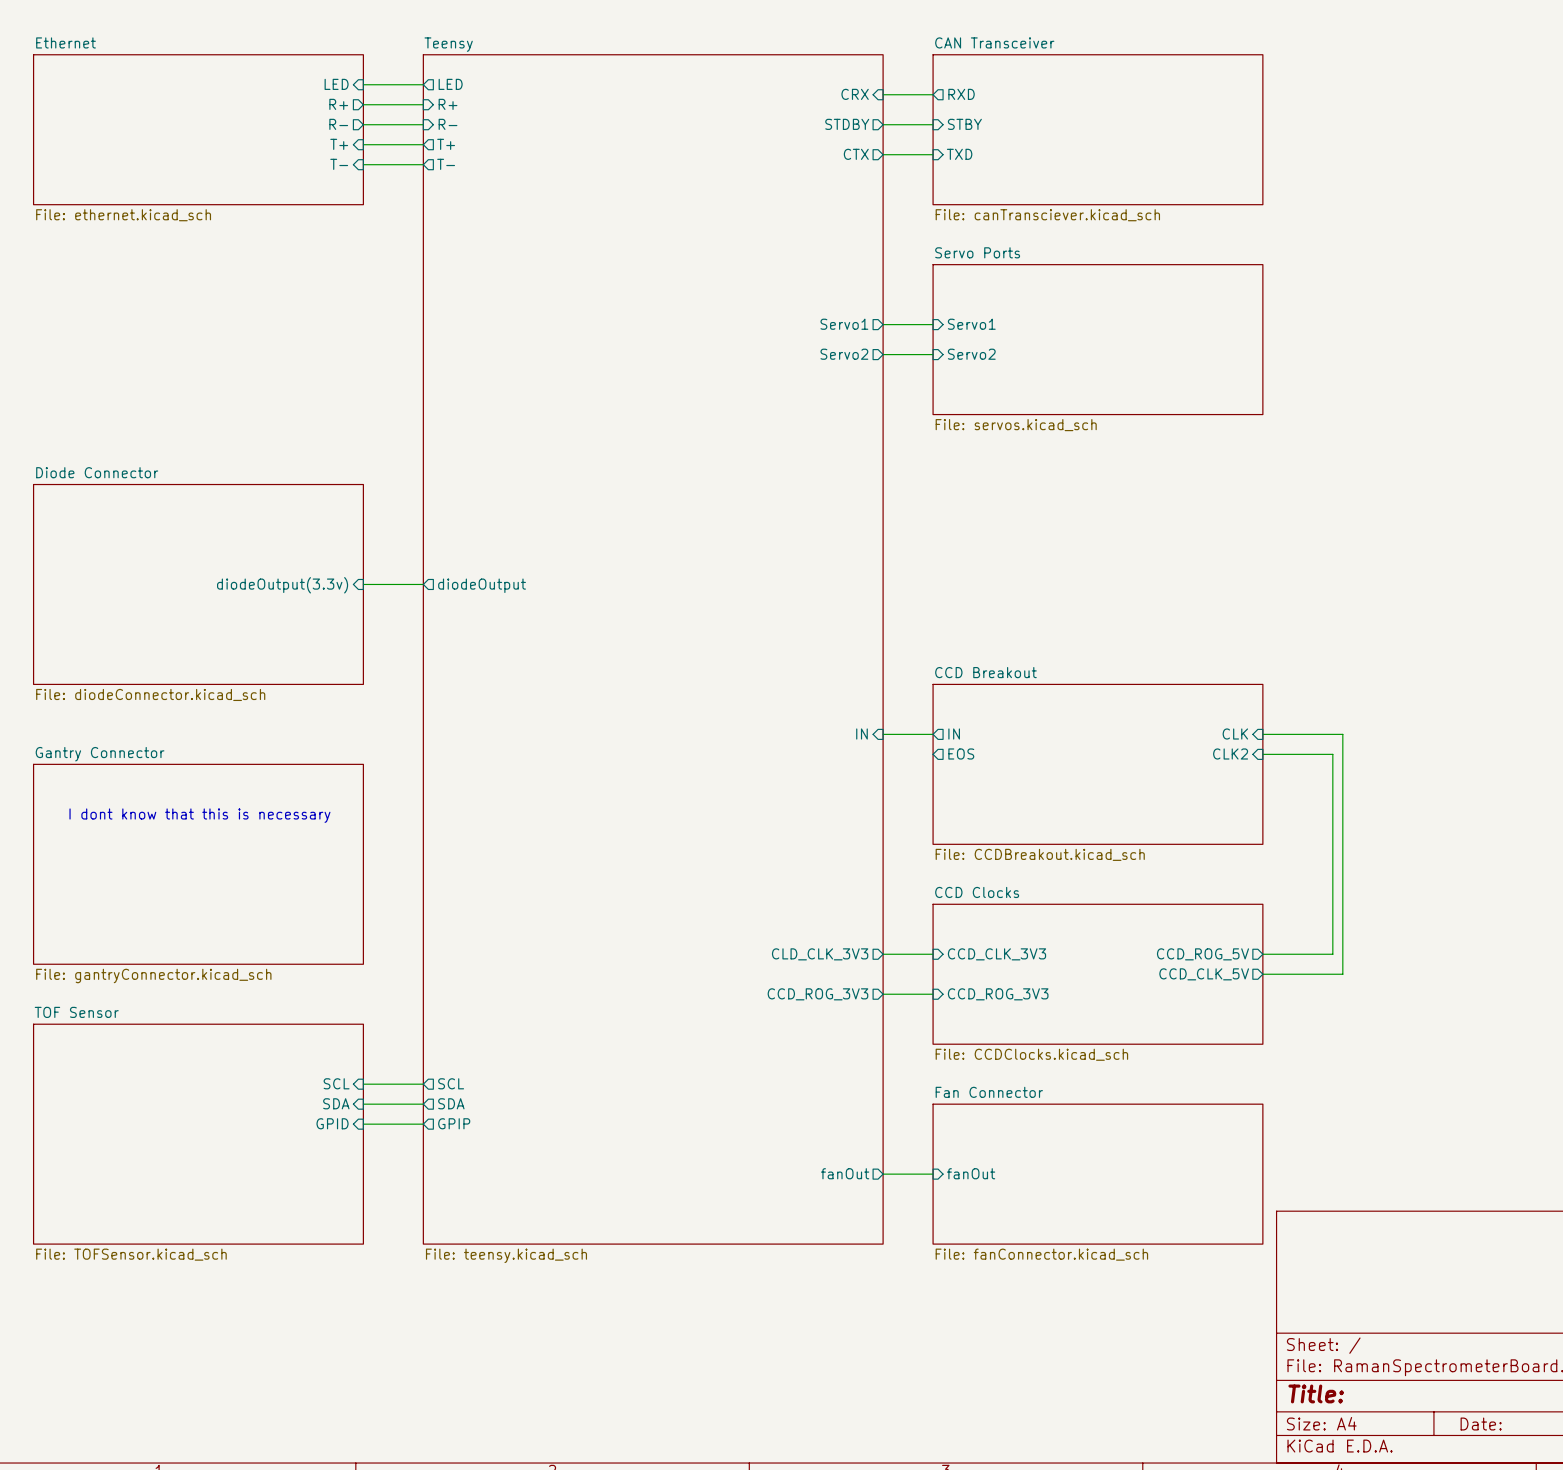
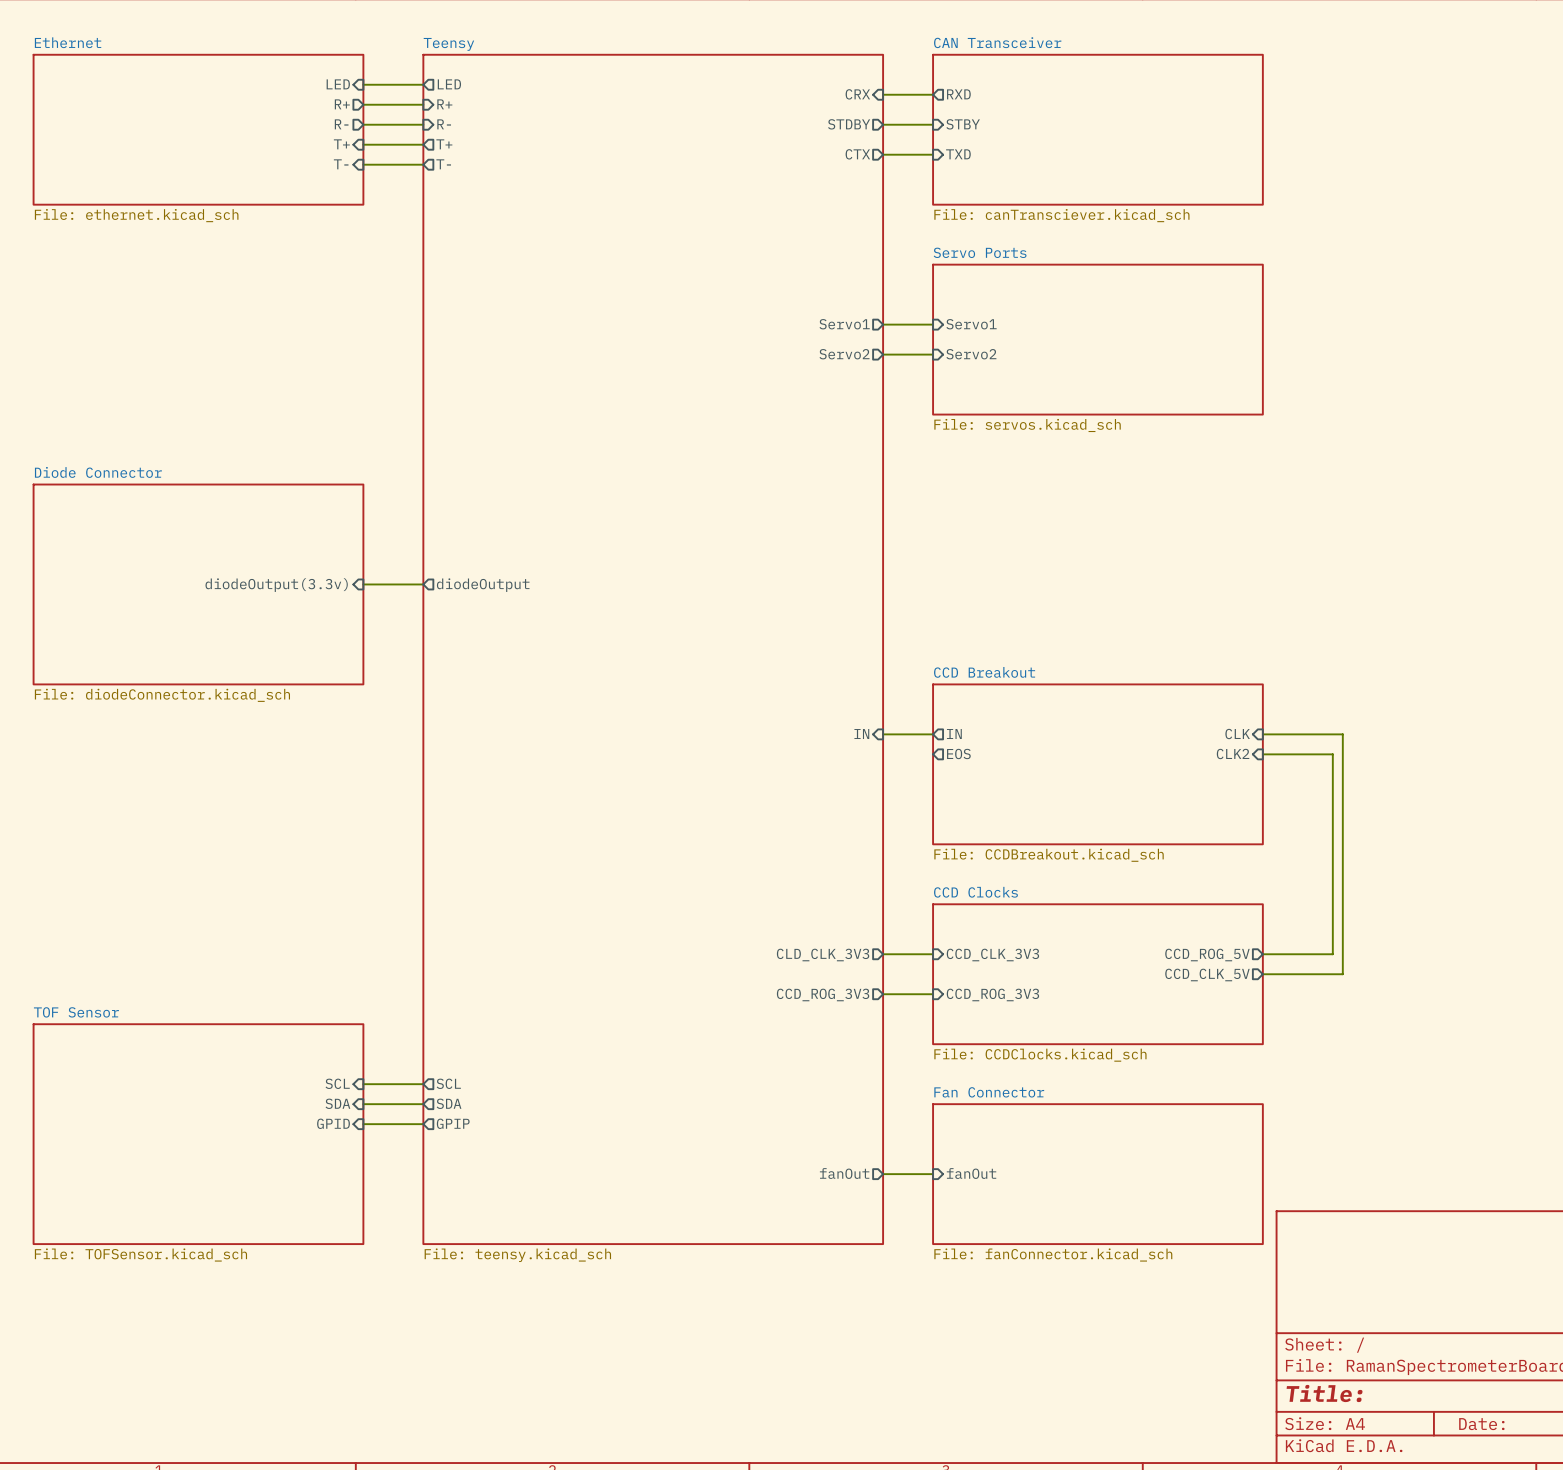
text: I dont know that this is necessary (199, 815) -> none
sheet Gantry Connector: File: gantryConnector.kicad_sch (198, 864) -> none

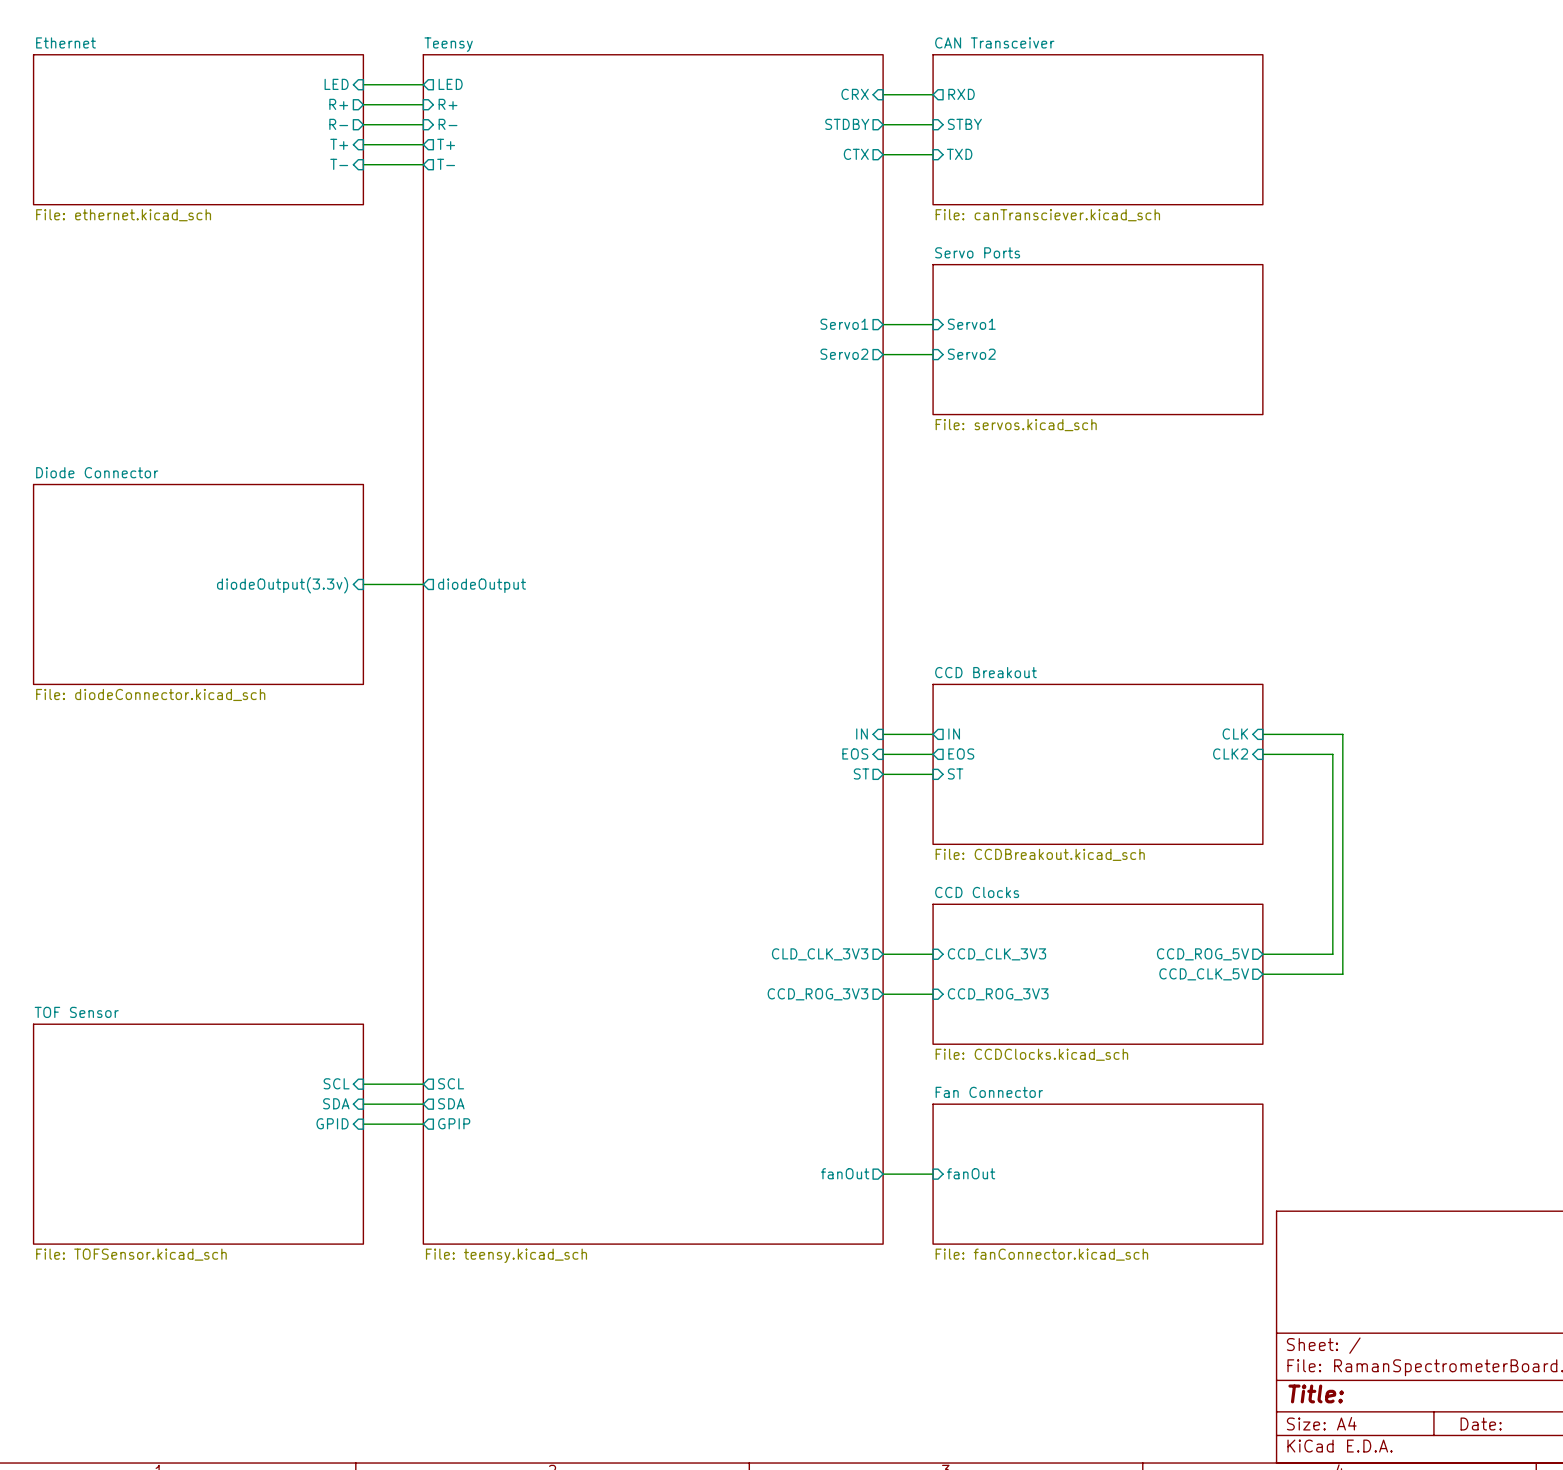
sheet pin: none -> EOS (855, 753)
wire: none -> (883, 754) (933, 754)
sheet pin: none -> ST (861, 773)
sheet pin: none -> ST (955, 773)
wire: none -> (883, 774) (933, 774)

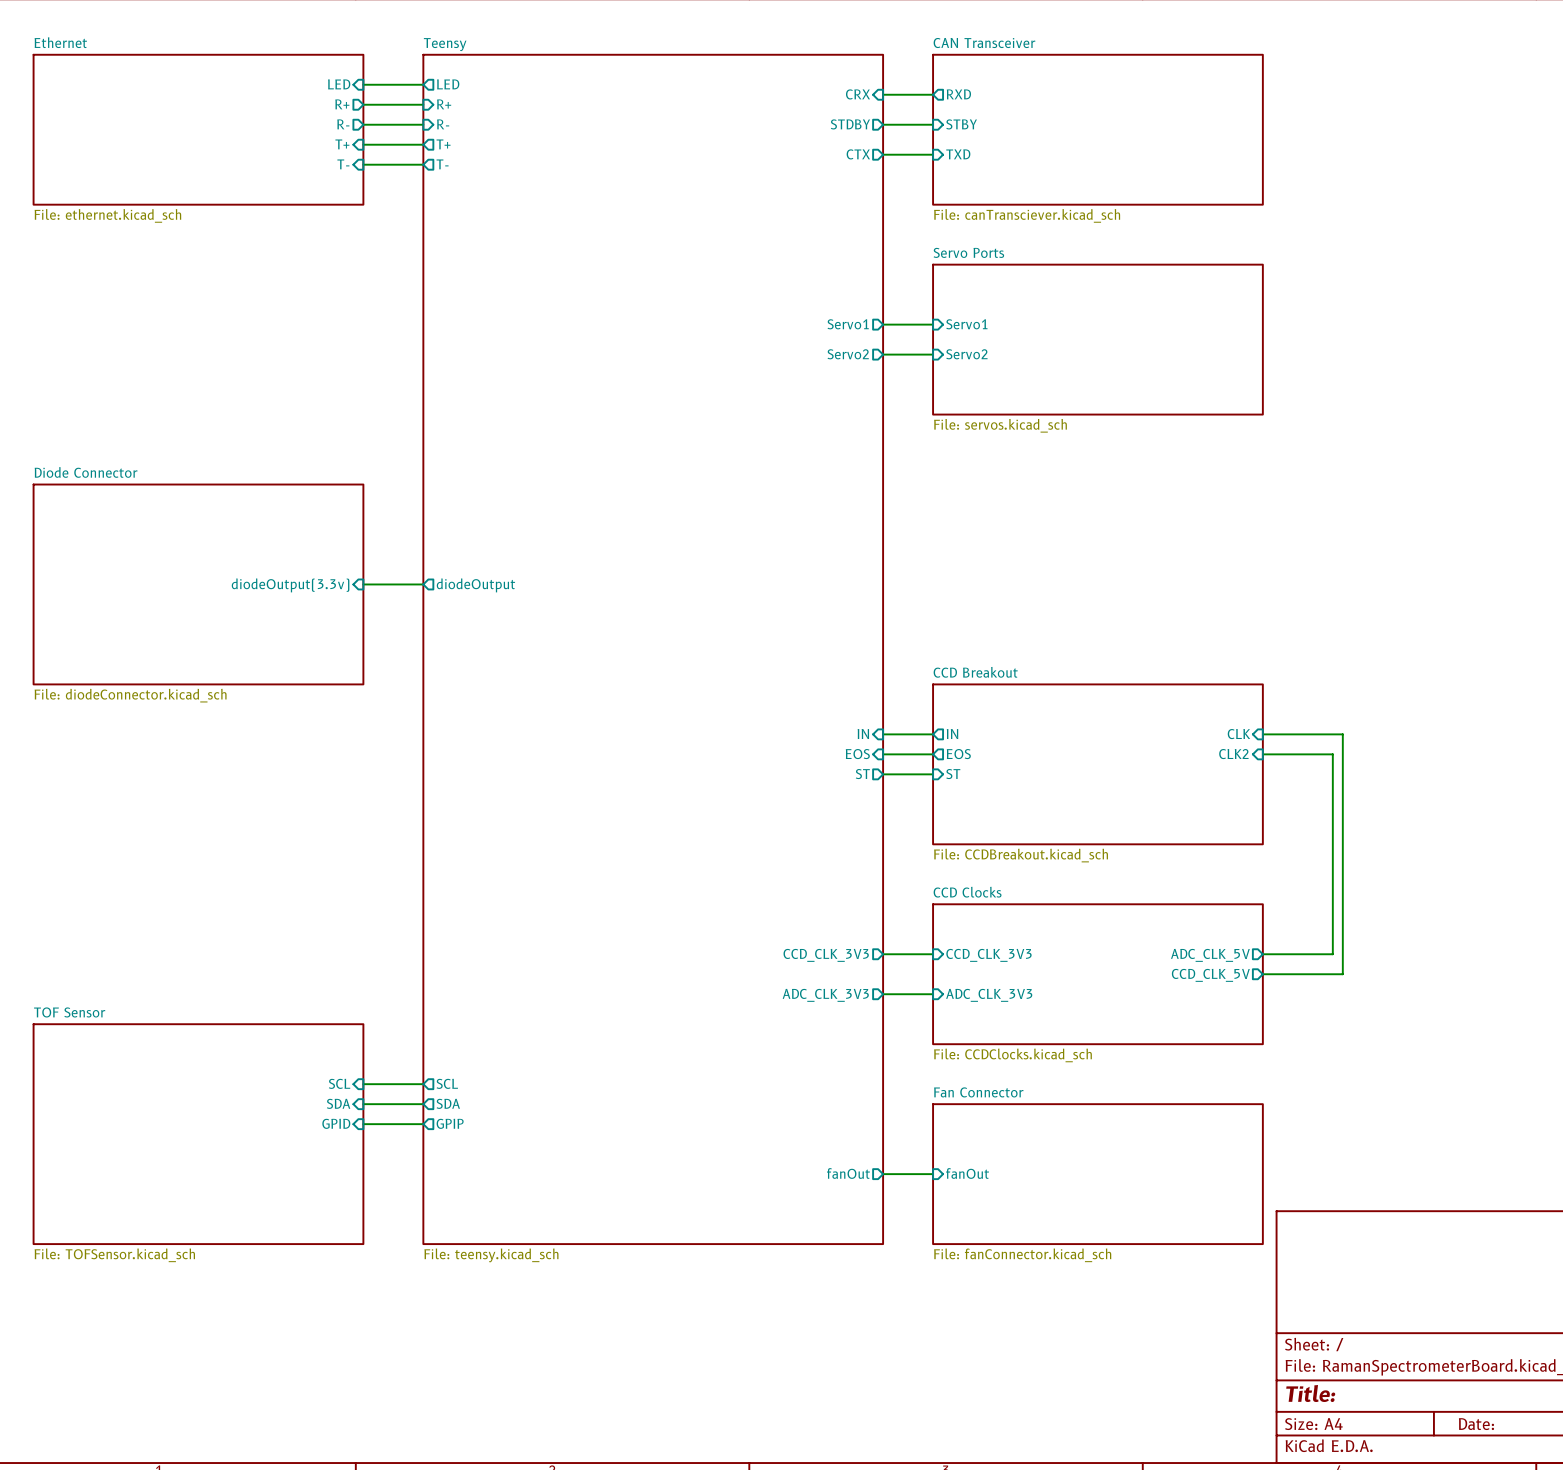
sheet pin: CLD_CLK_3V3 (820, 954) -> CCD_CLK_3V3 (826, 955)
sheet pin: CCD_ROG_5V (1202, 954) -> ADC_CLK_5V (1210, 955)
sheet pin: CCD_ROG_3V3 (817, 994) -> ADC_CLK_3V3 (825, 995)
sheet pin: CCD_ROG_3V3 (998, 994) -> ADC_CLK_3V3 (989, 995)

